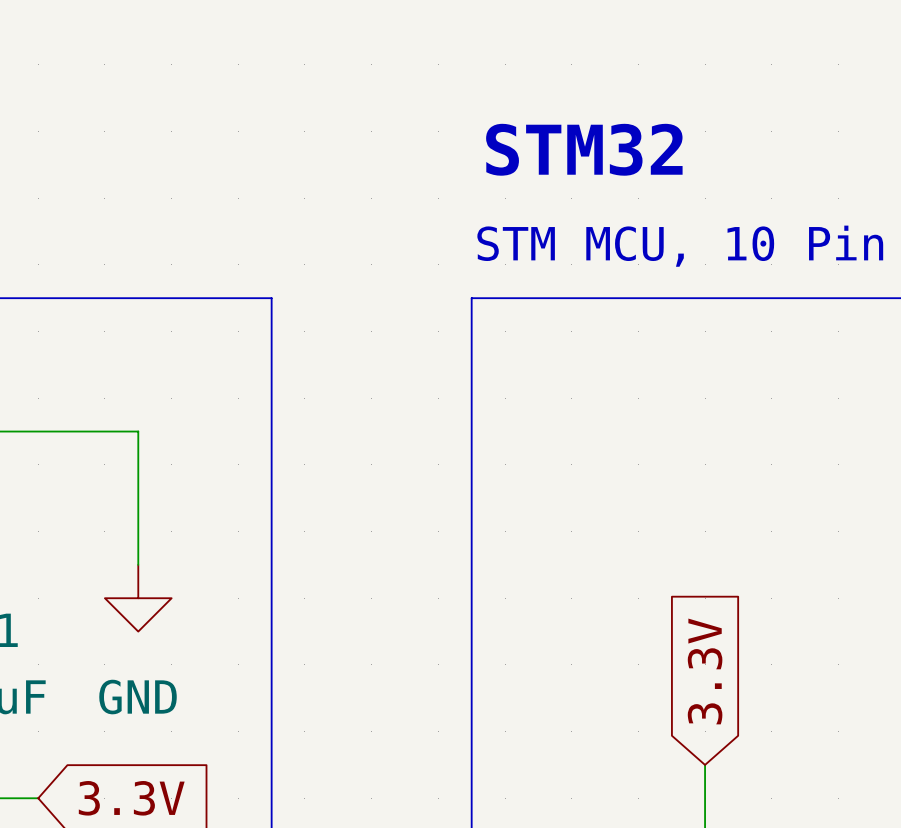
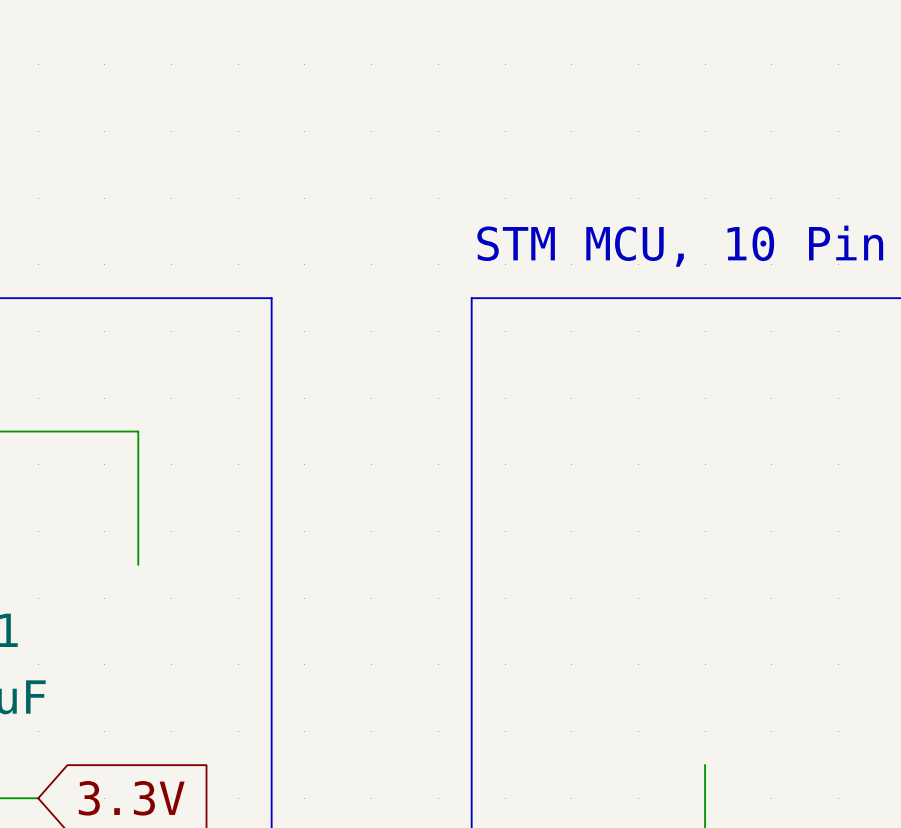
text: STM32 (584, 149) -> none
power symbol: GND (138, 598) -> none
global label: 3.3V (705, 671) -> none

